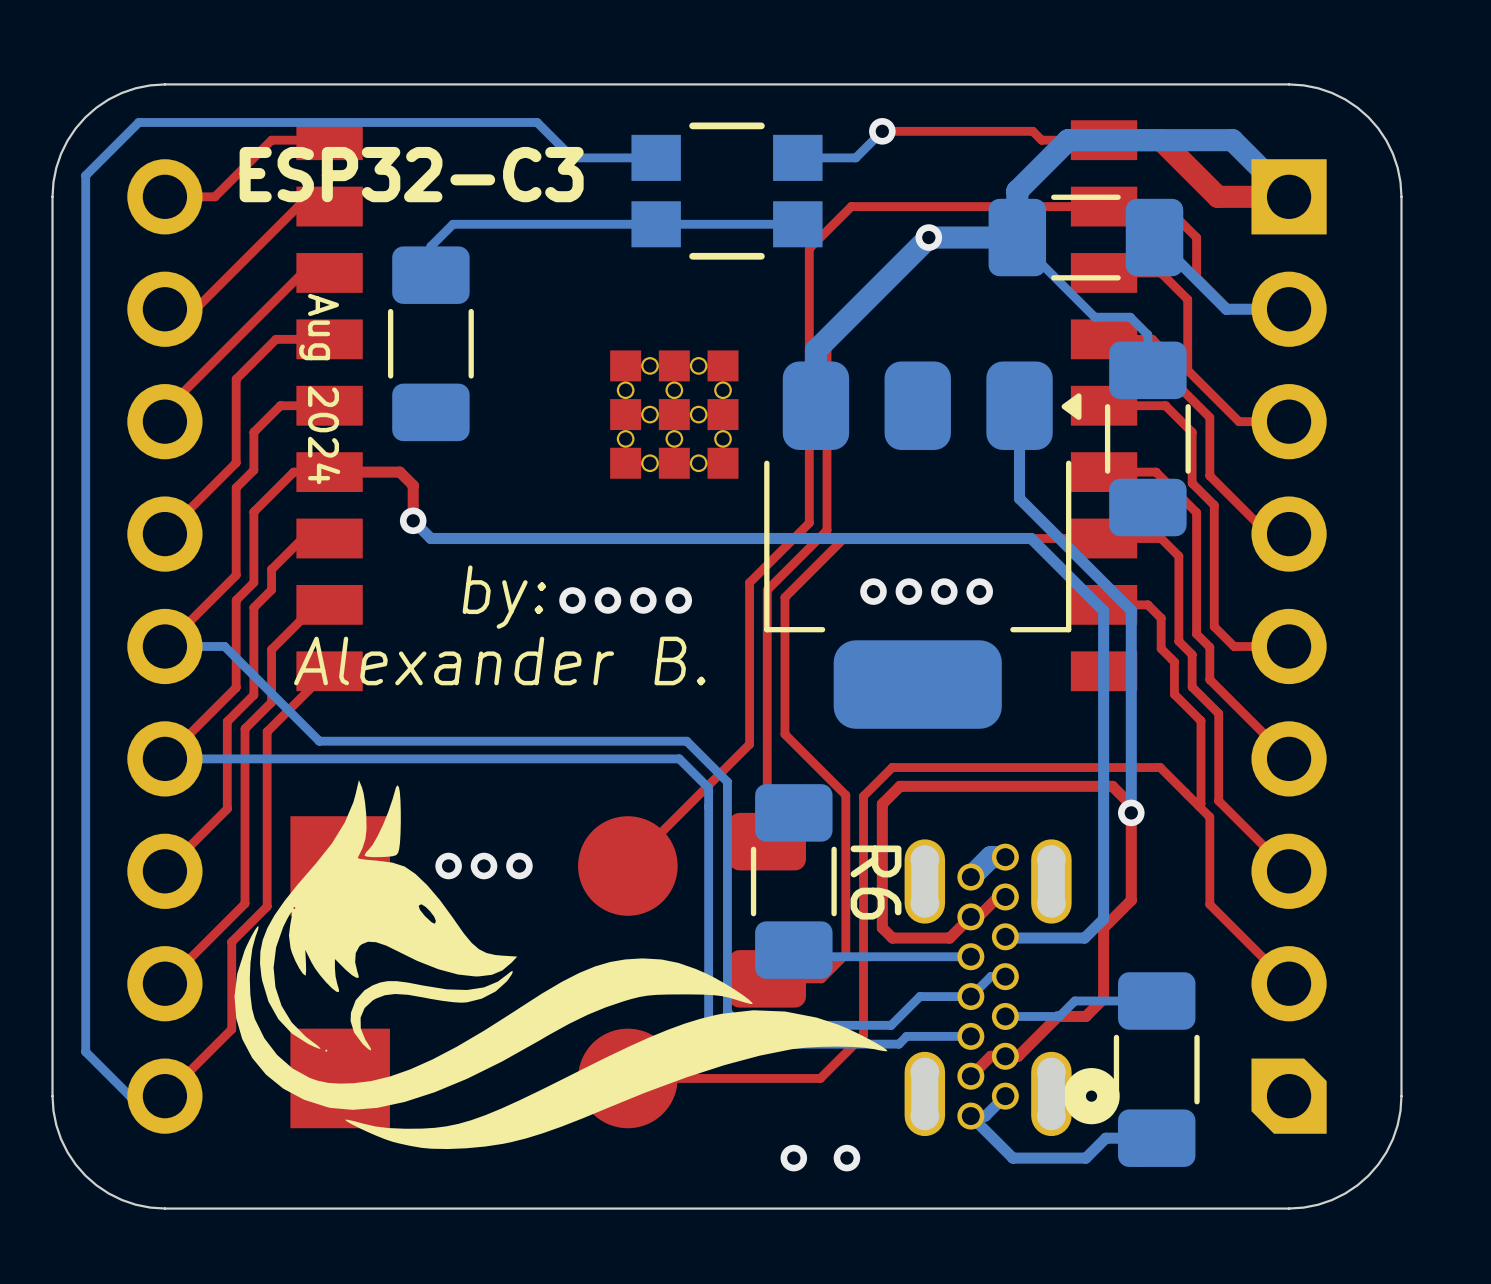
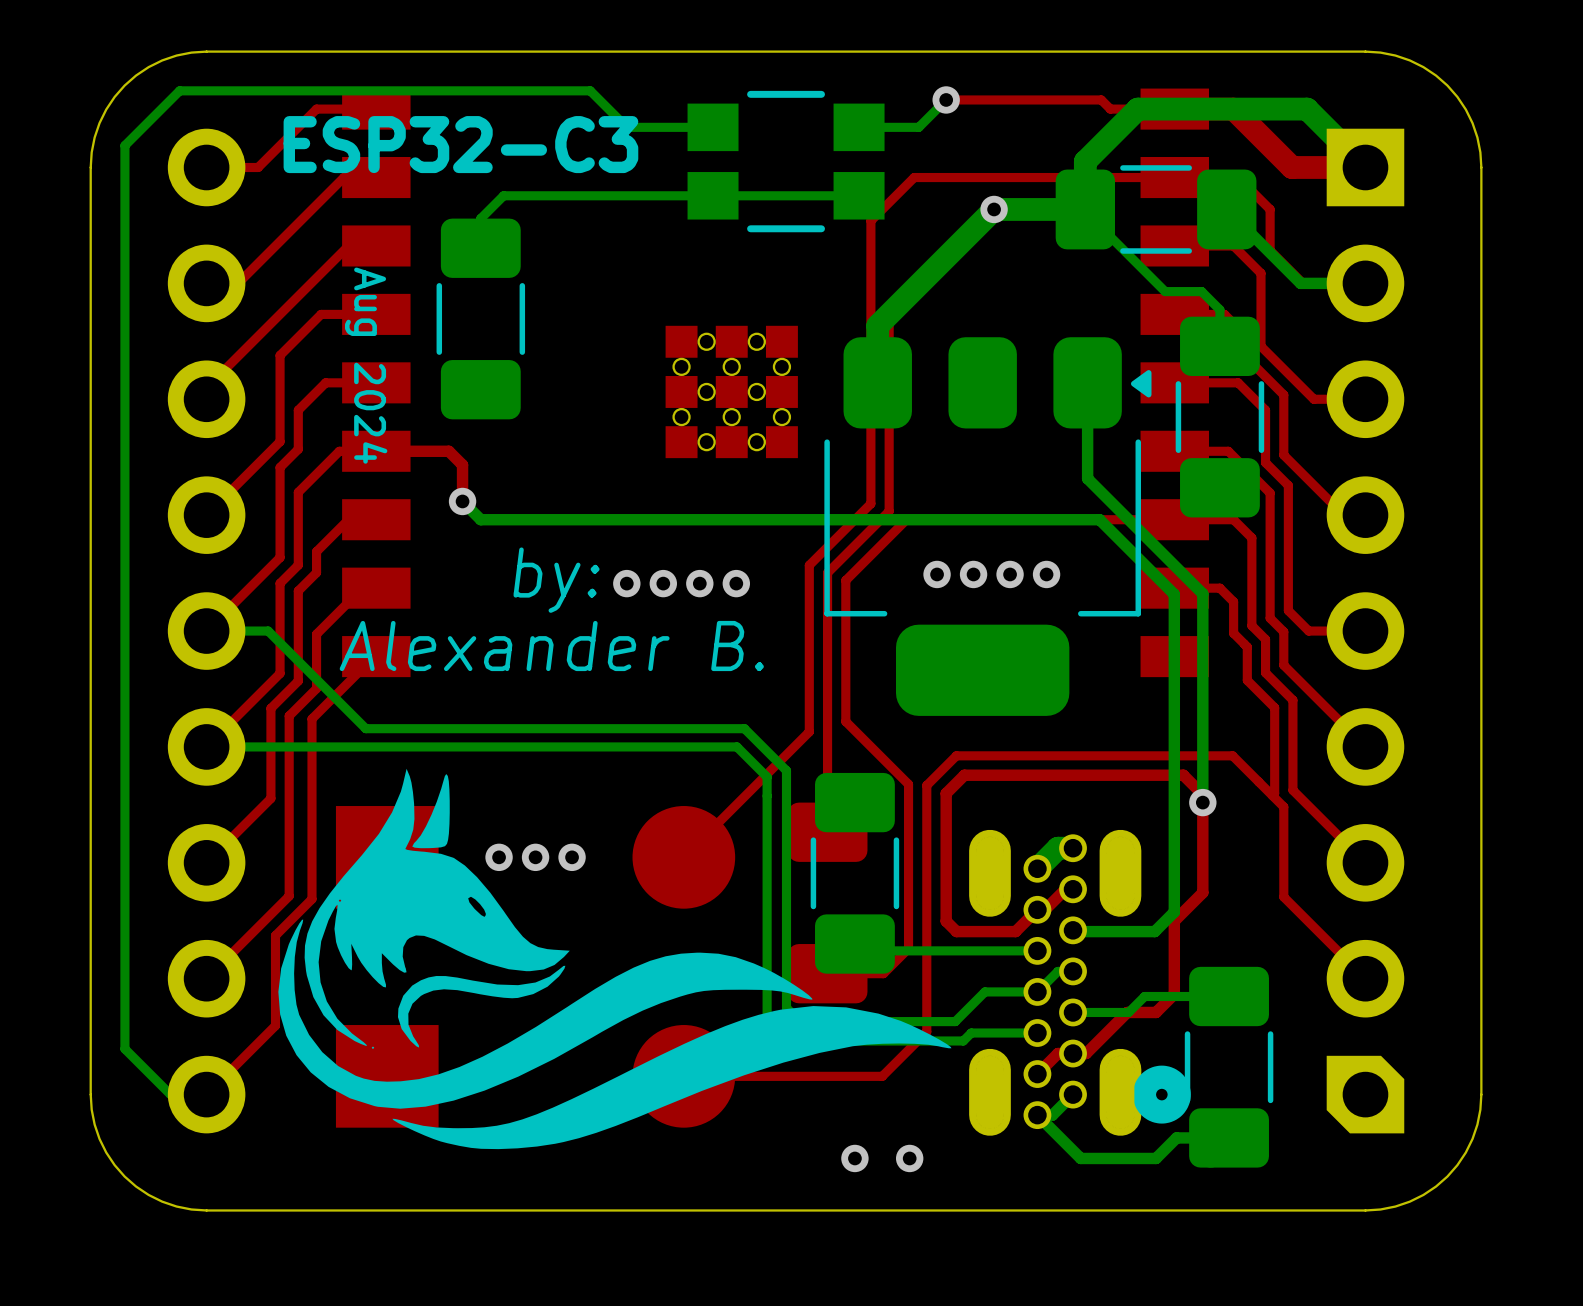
R6 name: R6 (876, 882) -> none

